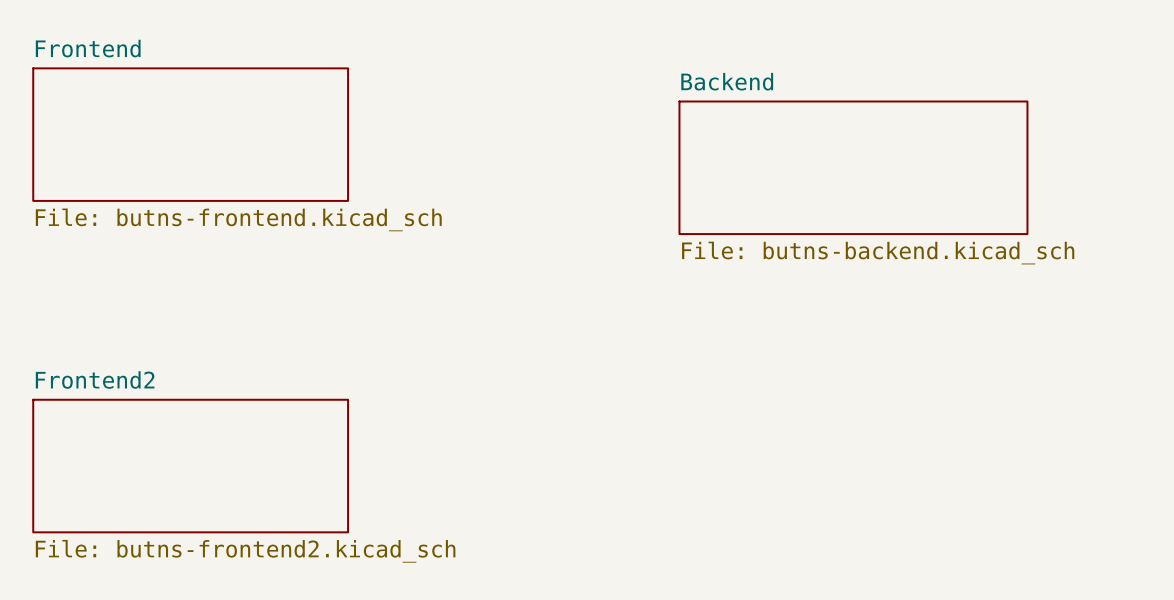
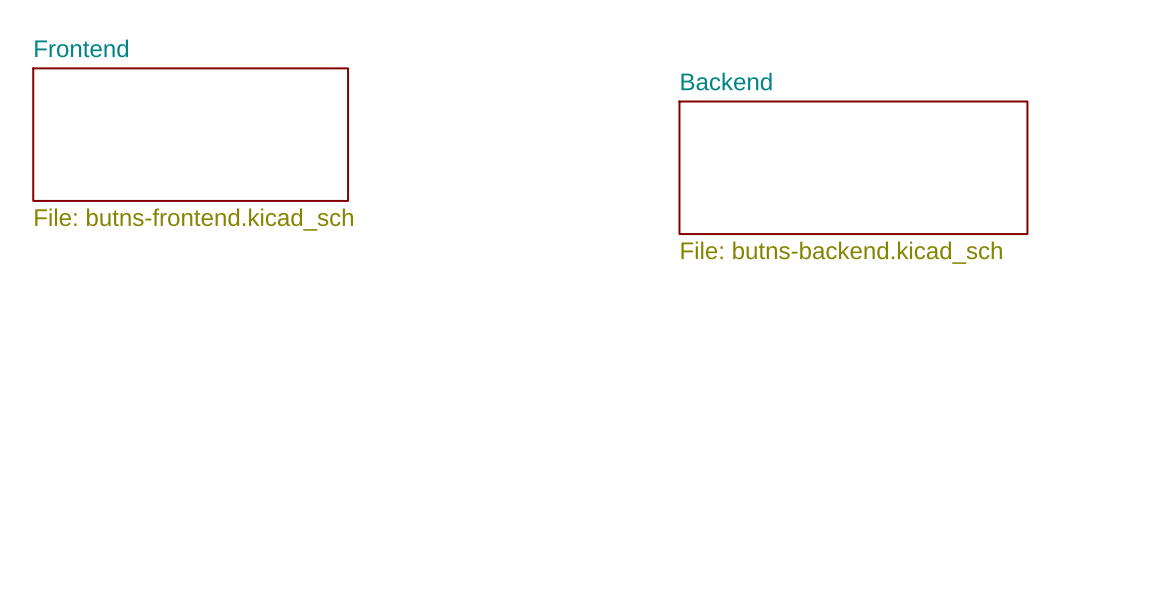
sheet Frontend2: File: butns-frontend2.kicad_sch (190, 466) -> none

